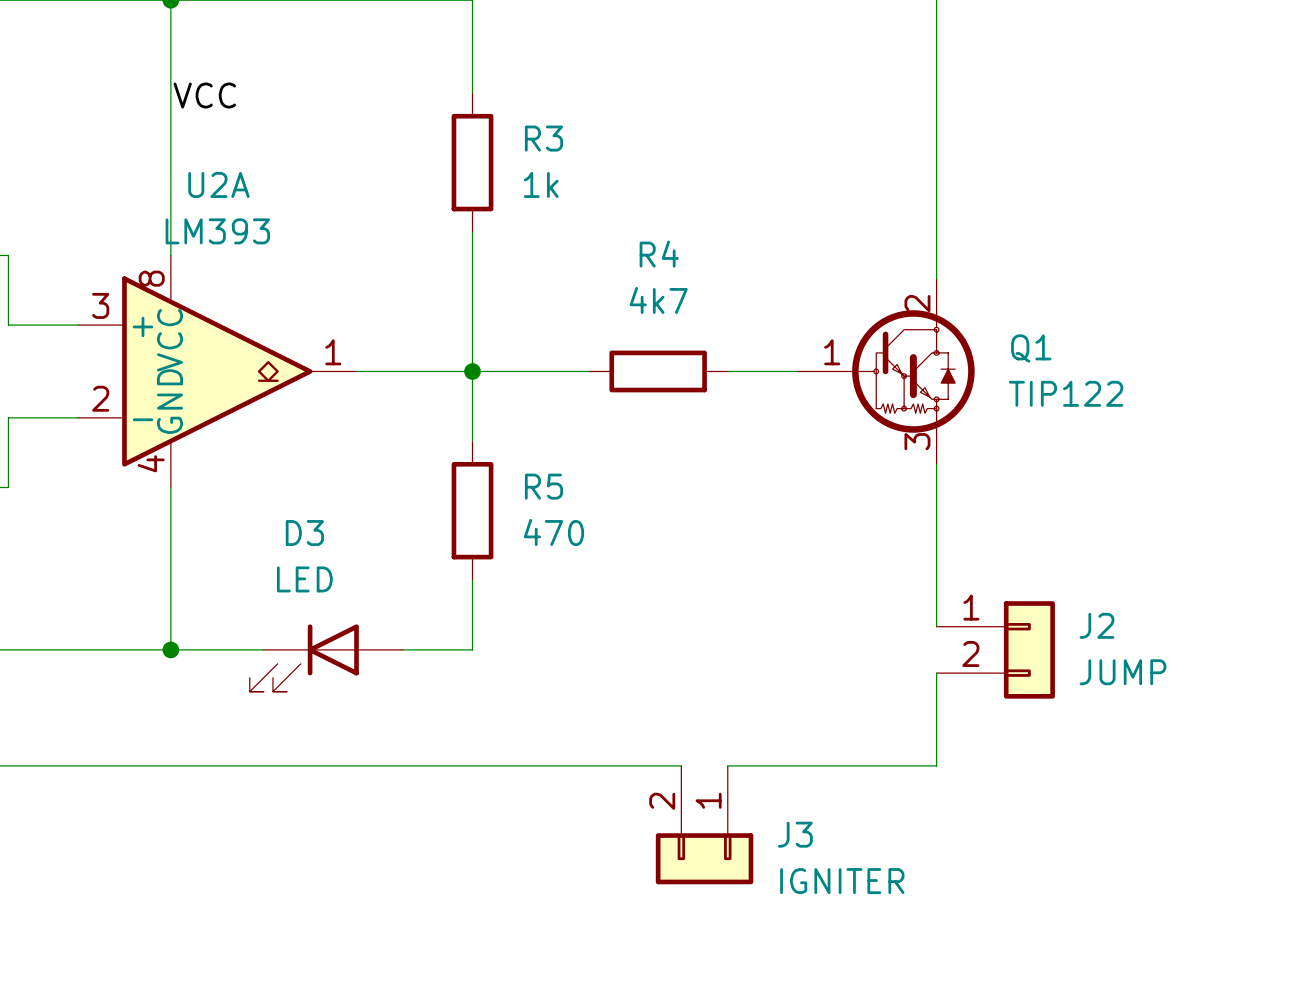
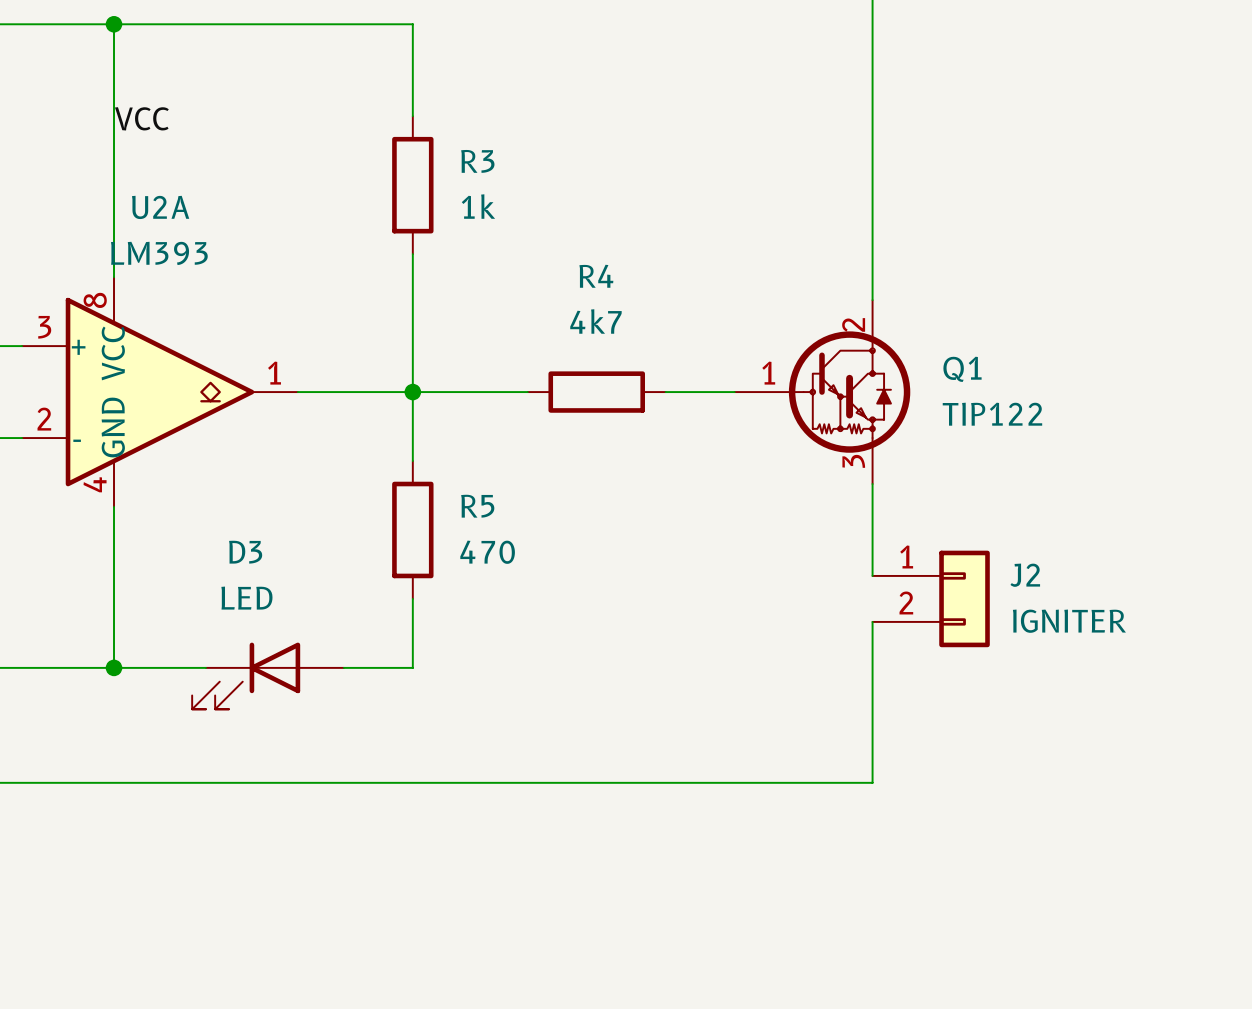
wire: (936, 557) (936, 603) -> (872, 644) (872, 690)
J2 position: (995, 649) -> (931, 598)
J2 value: JUMP (1122, 672) -> IGNITER (1069, 621)
wire: none -> (619, 782) (665, 782)
J3: IGNITER (704, 825) -> none

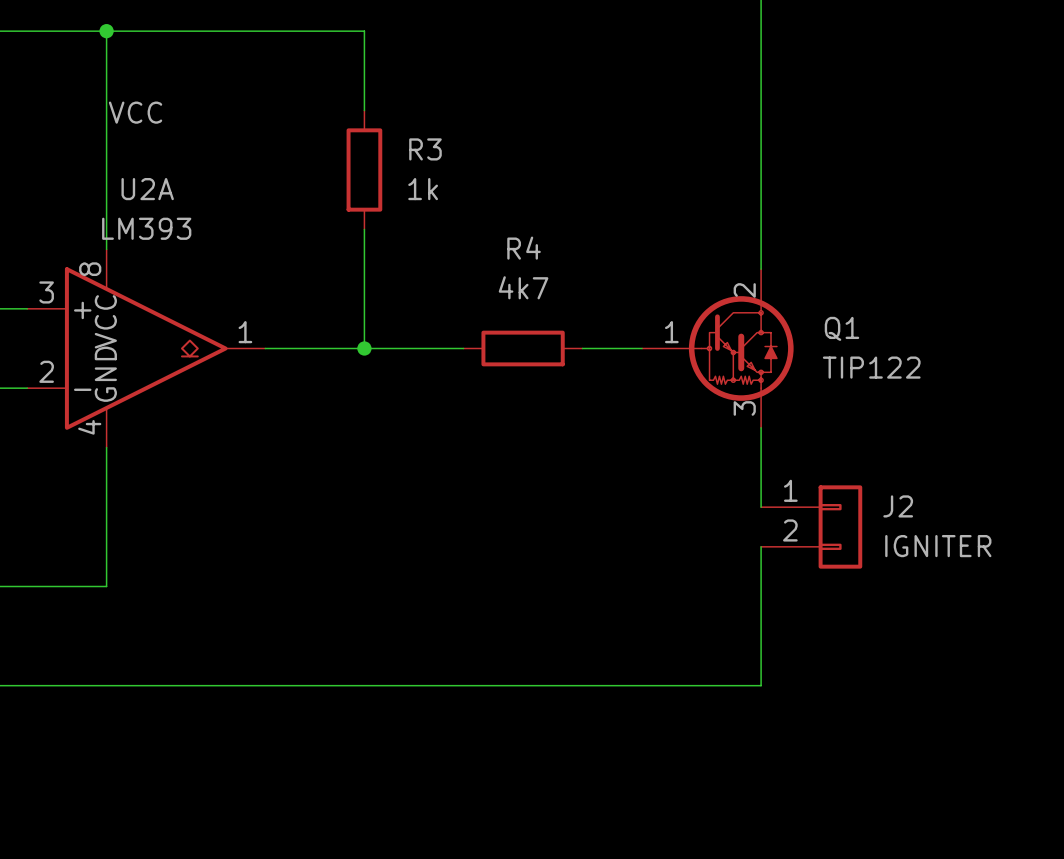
wire: (412, 392) (412, 461) -> none
R5: 470 (412, 529) -> none
wire: (412, 598) (412, 667) (343, 667) -> none
wire: (114, 667) (205, 667) -> none
junction: (114, 667) -> none
D3: LED (268, 675) -> none

